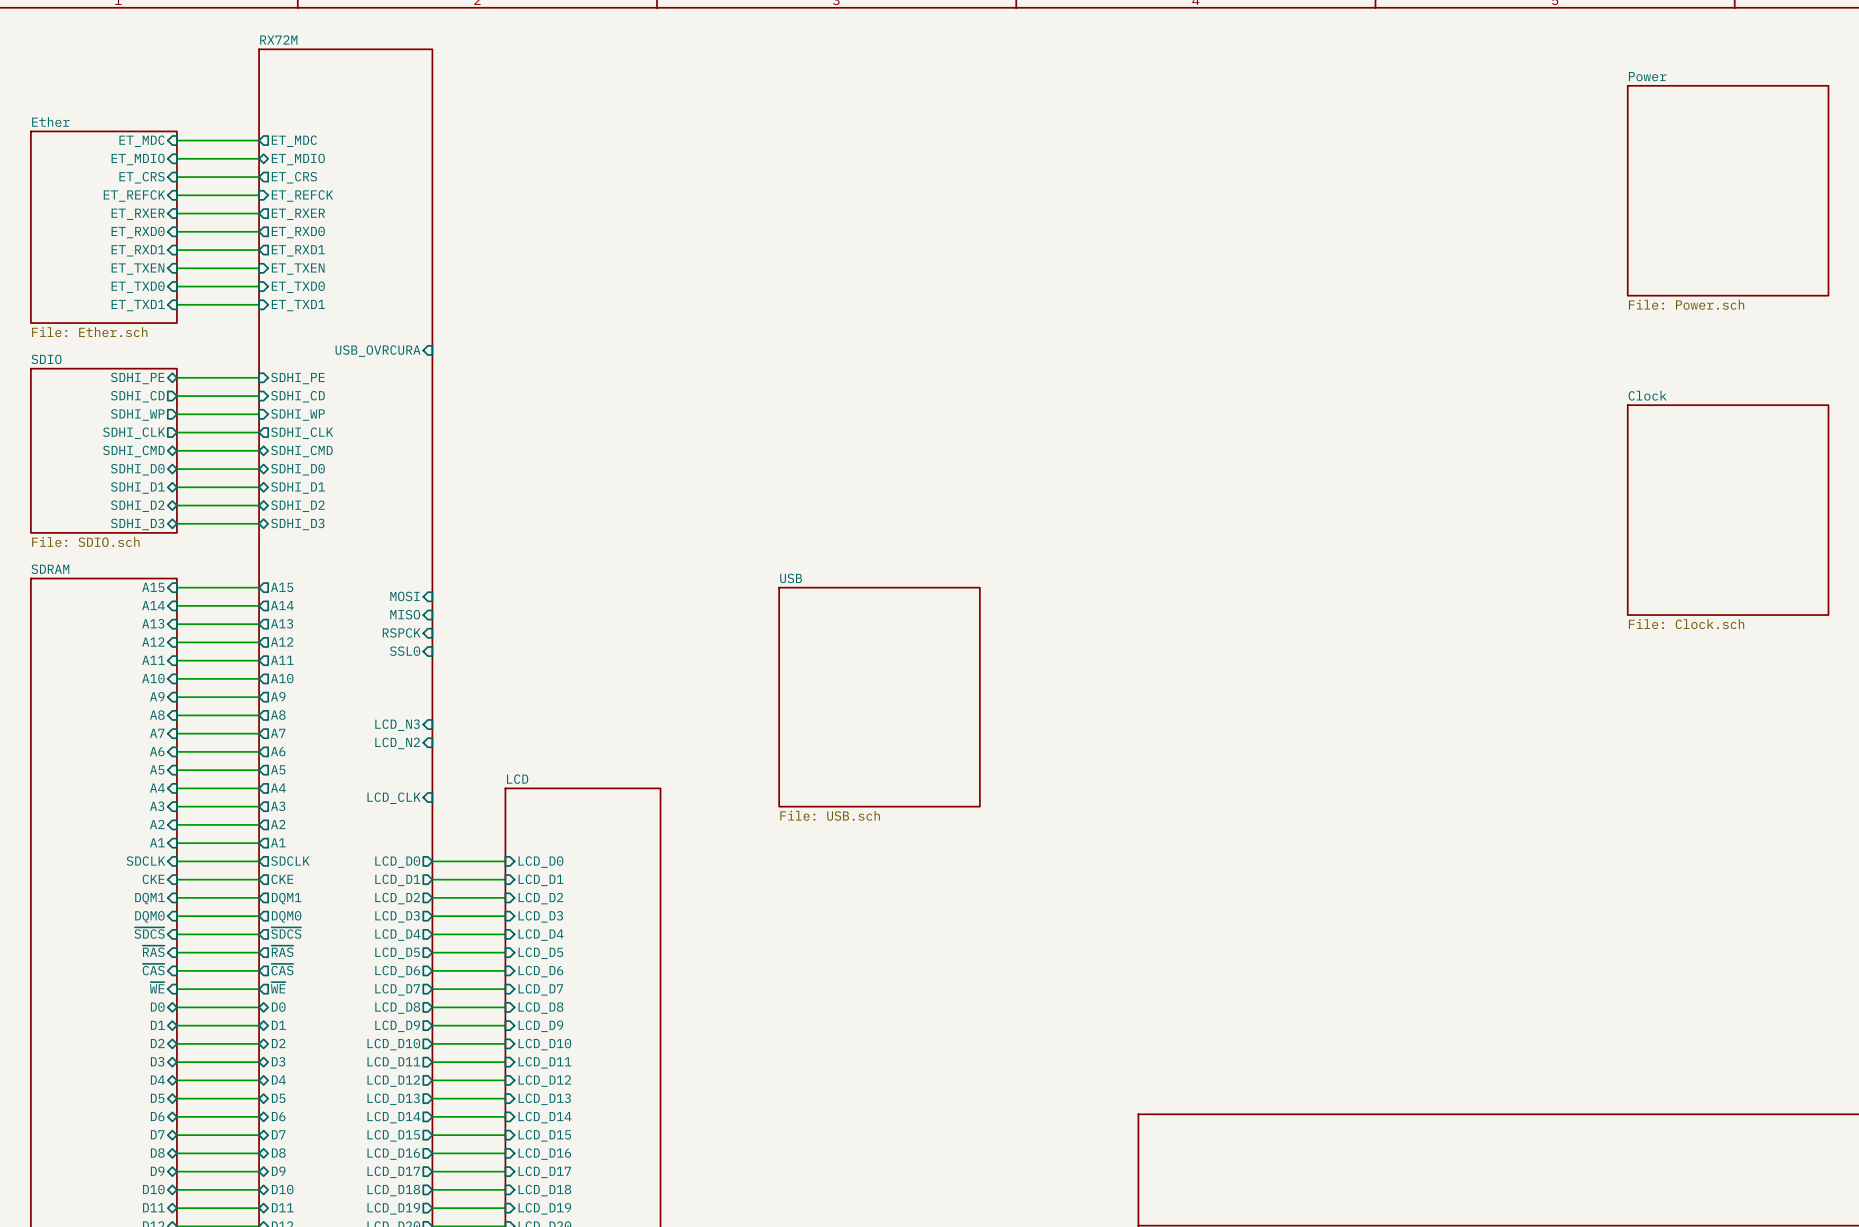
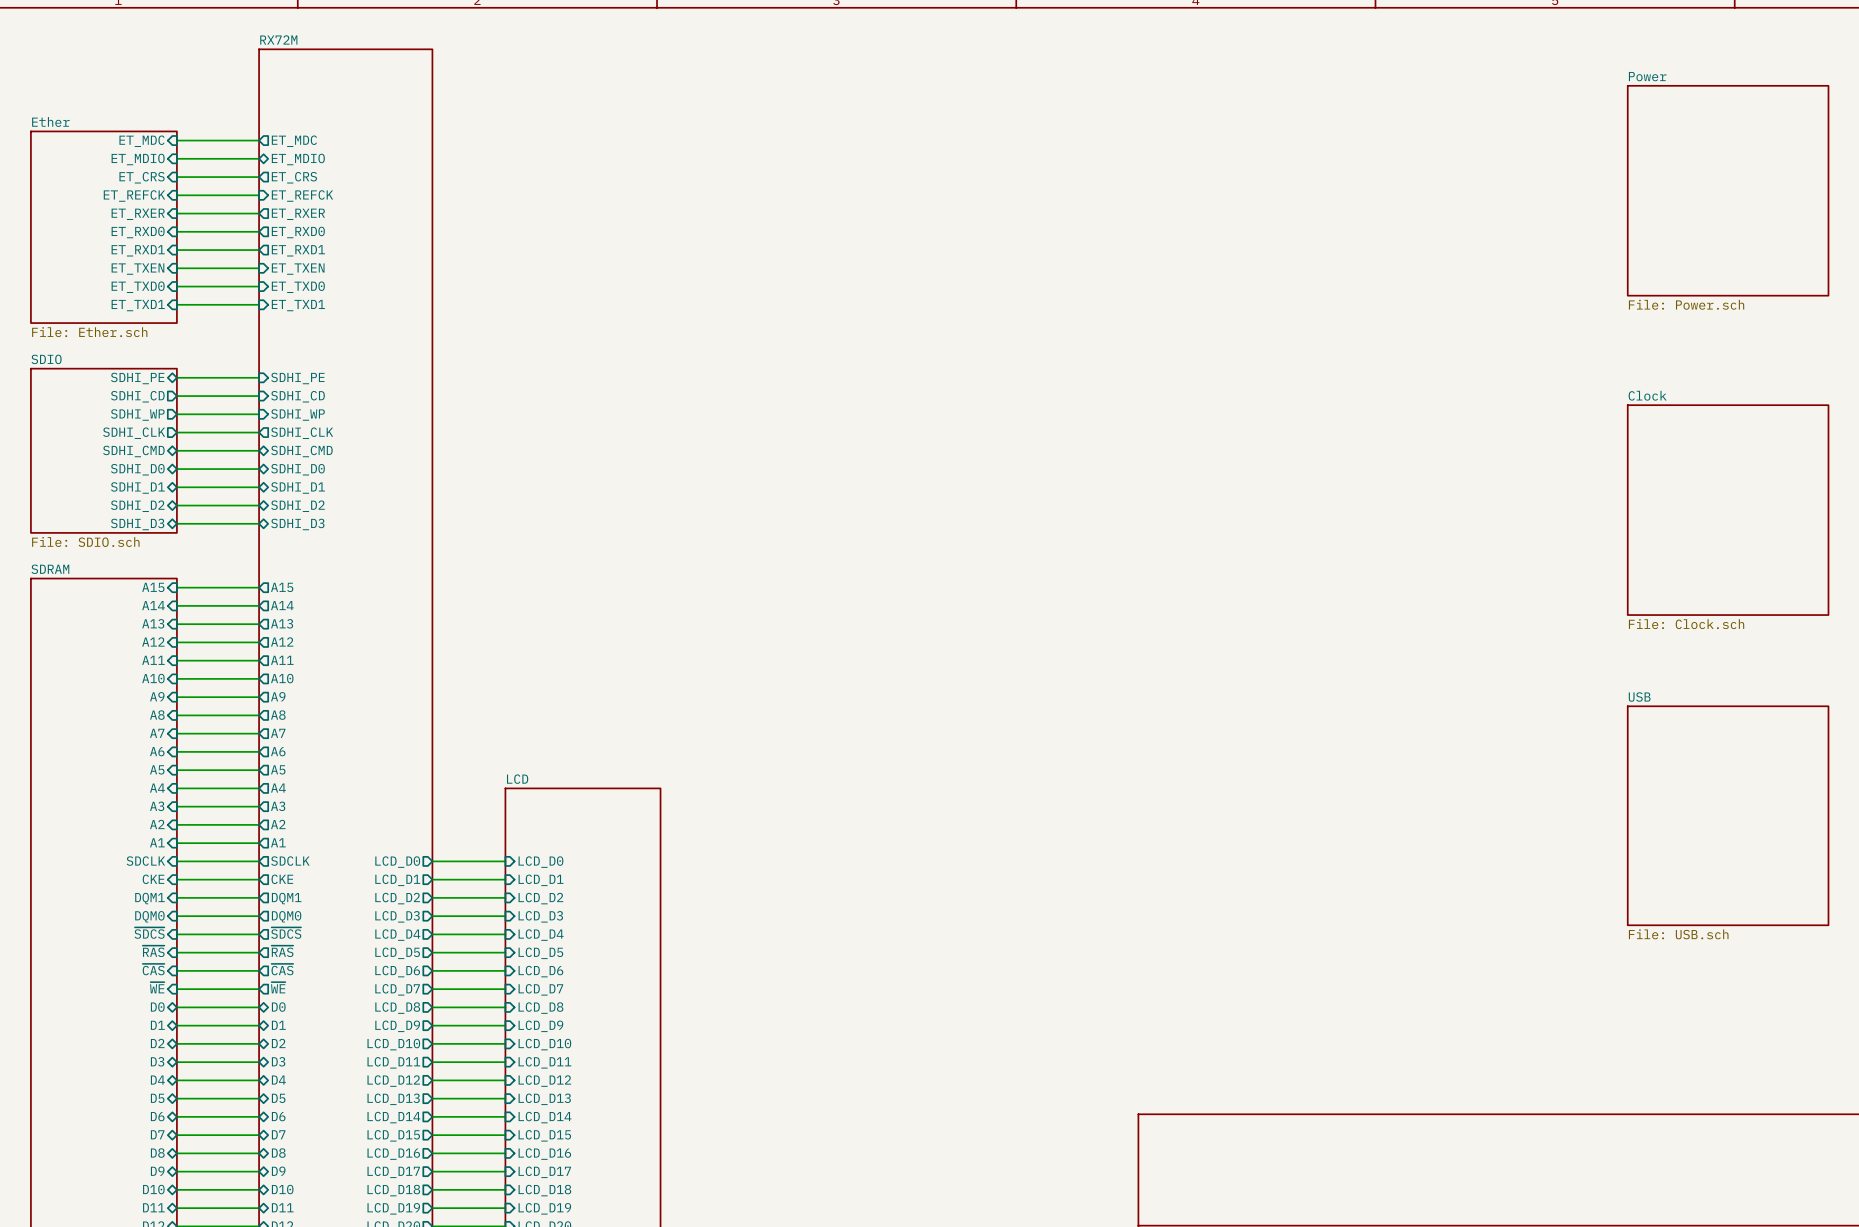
sheet pin: USB_OVRCURA (378, 351) -> none
sheet pin: MOSI (405, 596) -> none
sheet pin: MISO (405, 614) -> none
sheet pin: RSPCK (401, 632) -> none
sheet pin: SSL0 (405, 651) -> none
sheet USB: File: USB.sch (879, 697) -> none
sheet pin: LCD_N3 (397, 725) -> none
sheet pin: LCD_N2 (397, 743) -> none
sheet pin: LCD_CLK (394, 798) -> none
sheet USB: none -> File: USB.sch (1728, 815)

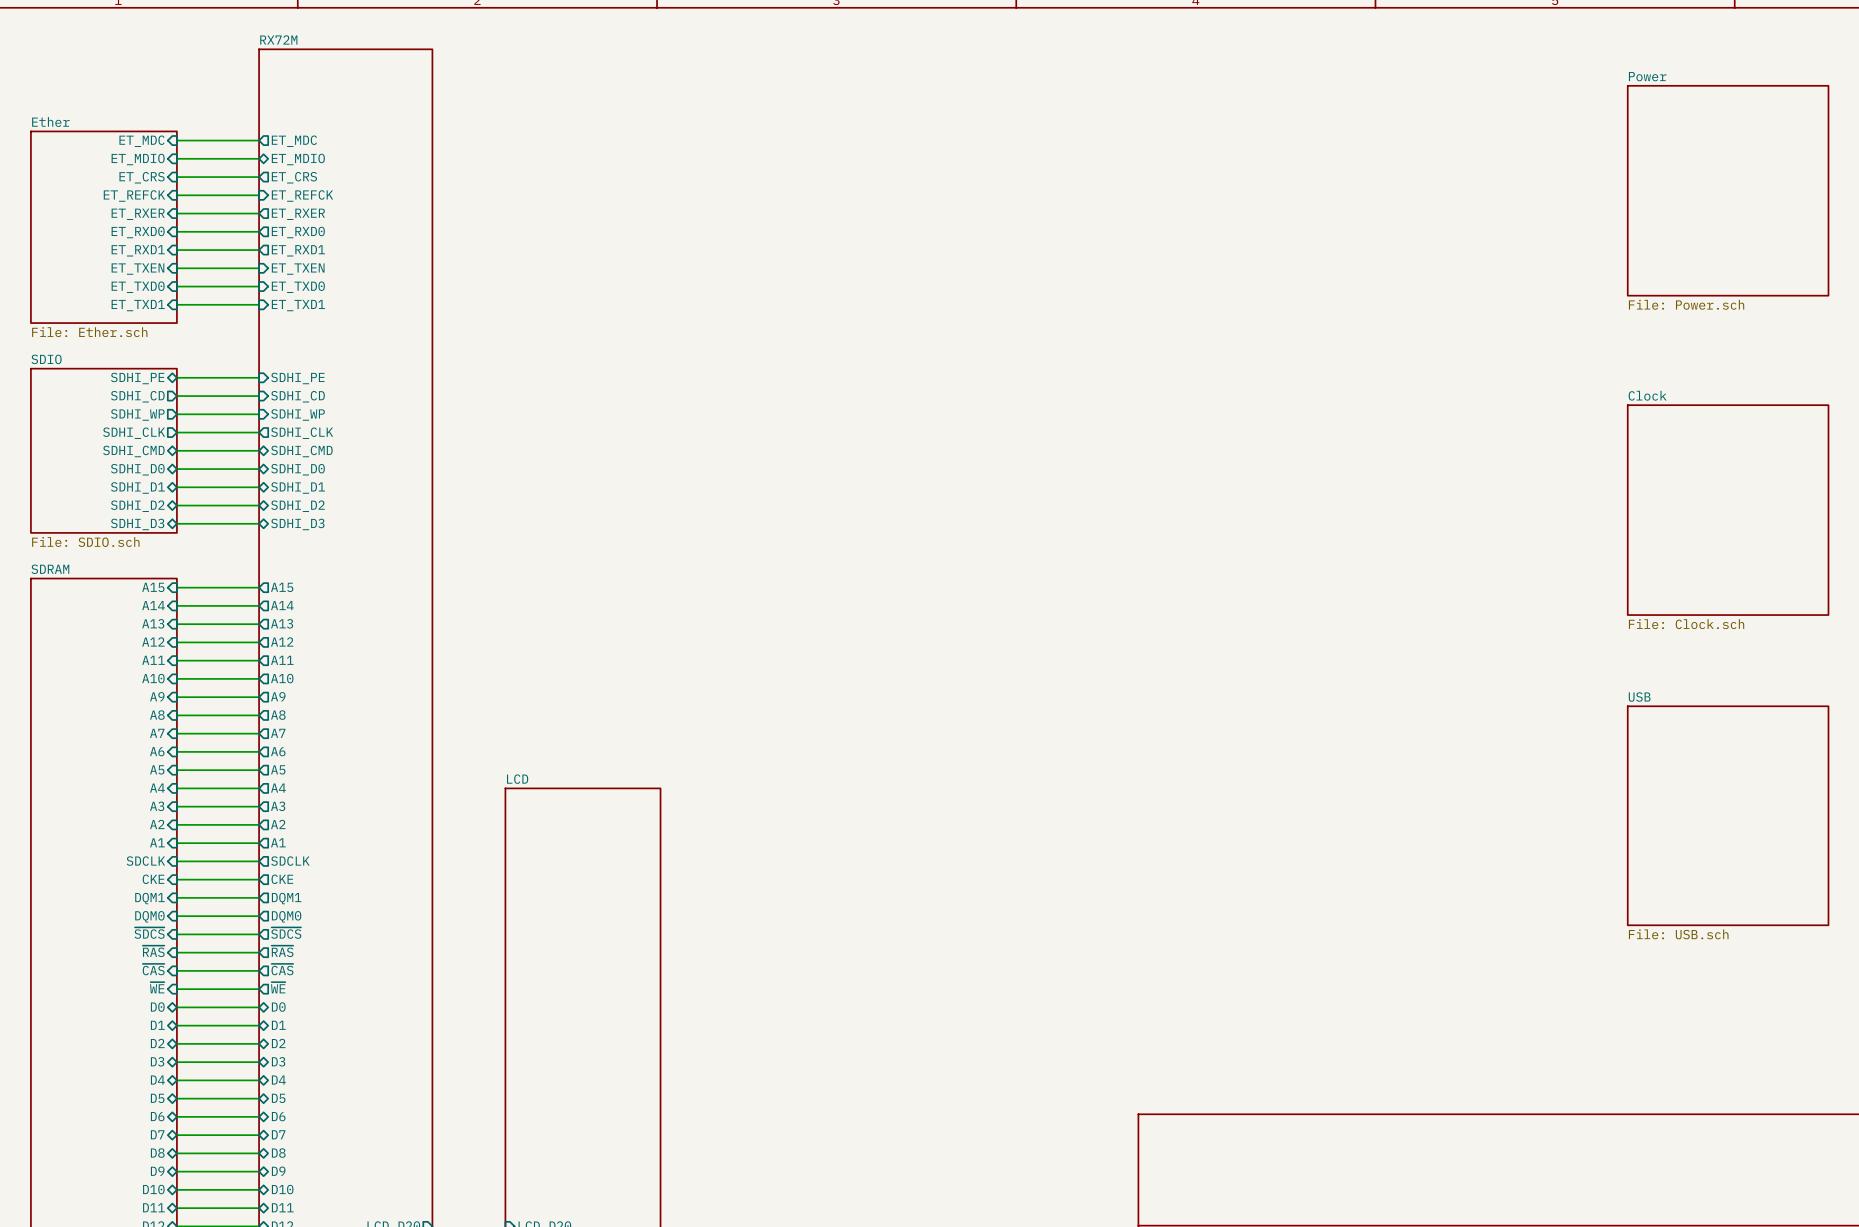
wire: (432, 861) (505, 861) -> none
sheet pin: LCD_D0 (397, 862) -> none
sheet pin: LCD_D0 (540, 862) -> none
wire: (432, 879) (505, 879) -> none
sheet pin: LCD_D1 (397, 880) -> none
sheet pin: LCD_D1 (541, 880) -> none
wire: (432, 897) (505, 897) -> none
sheet pin: LCD_D2 (397, 898) -> none
sheet pin: LCD_D2 (540, 898) -> none
sheet pin: LCD_D3 (397, 916) -> none
wire: (432, 916) (505, 916) -> none
sheet pin: LCD_D3 (540, 916) -> none
wire: (432, 934) (505, 934) -> none
sheet pin: LCD_D4 (397, 935) -> none
sheet pin: LCD_D4 (541, 935) -> none
wire: (432, 952) (505, 952) -> none
sheet pin: LCD_D5 (397, 953) -> none
sheet pin: LCD_D5 (540, 953) -> none
wire: (432, 970) (505, 970) -> none
sheet pin: LCD_D6 (397, 971) -> none
sheet pin: LCD_D6 (540, 971) -> none
sheet pin: LCD_D7 (397, 989) -> none
wire: (432, 989) (505, 989) -> none
sheet pin: LCD_D7 (540, 989) -> none
wire: (432, 1007) (505, 1007) -> none
sheet pin: LCD_D8 (397, 1008) -> none
sheet pin: LCD_D8 (540, 1008) -> none
wire: (432, 1025) (505, 1025) -> none
sheet pin: LCD_D9 (397, 1026) -> none
sheet pin: LCD_D9 (540, 1026) -> none
wire: (432, 1043) (505, 1043) -> none
sheet pin: LCD_D10 (393, 1044) -> none
sheet pin: LCD_D10 (544, 1044) -> none
sheet pin: LCD_D11 (393, 1062) -> none
wire: (432, 1062) (505, 1062) -> none
sheet pin: LCD_D11 (544, 1062) -> none
wire: (432, 1080) (505, 1080) -> none
sheet pin: LCD_D12 (393, 1081) -> none
sheet pin: LCD_D12 (544, 1081) -> none
wire: (432, 1098) (505, 1098) -> none
sheet pin: LCD_D13 (393, 1099) -> none
sheet pin: LCD_D13 (544, 1099) -> none
wire: (432, 1116) (505, 1116) -> none
sheet pin: LCD_D14 (393, 1117) -> none
sheet pin: LCD_D14 (544, 1117) -> none
sheet pin: LCD_D15 (393, 1135) -> none
wire: (432, 1135) (505, 1135) -> none
sheet pin: LCD_D15 (544, 1135) -> none
wire: (432, 1153) (505, 1153) -> none
sheet pin: LCD_D16 (393, 1154) -> none
sheet pin: LCD_D16 (544, 1154) -> none
wire: (432, 1171) (505, 1171) -> none
sheet pin: LCD_D17 (393, 1172) -> none
sheet pin: LCD_D17 (544, 1172) -> none
wire: (432, 1189) (505, 1189) -> none
sheet pin: LCD_D18 (393, 1190) -> none
sheet pin: LCD_D18 (544, 1190) -> none
sheet pin: LCD_D19 (393, 1208) -> none
wire: (432, 1208) (505, 1208) -> none
sheet pin: LCD_D19 (544, 1208) -> none
wire: (432, 1226) (505, 1226) -> none

